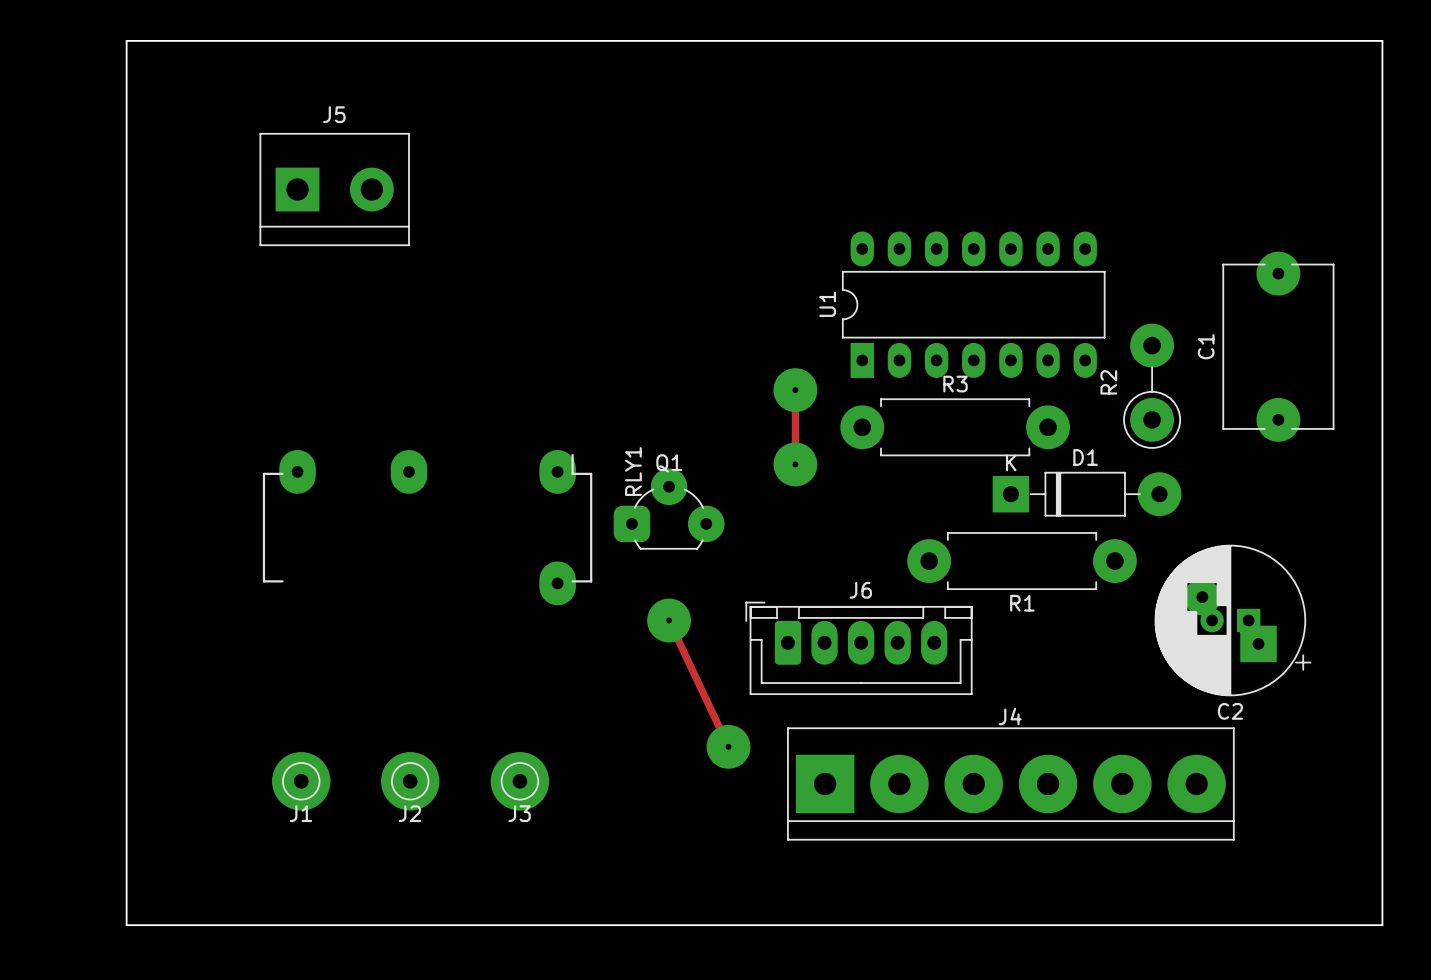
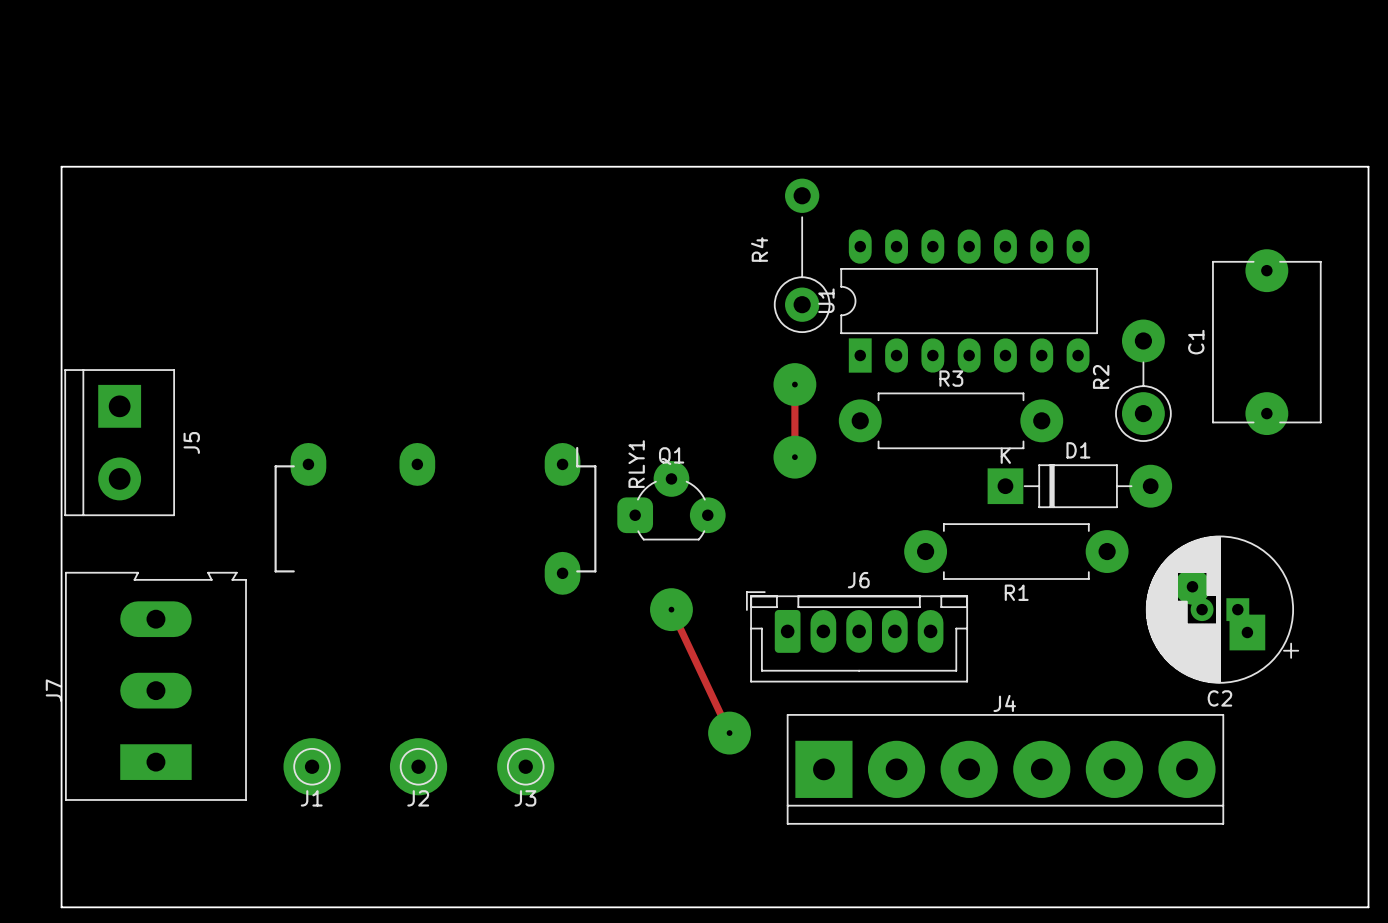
board edge: (1382, 167) (1382, 40) (126, 40) (126, 925) -> (1368, 166) (61, 166) (61, 907) (141, 907)
J5 rotation: 0° (334, 189) -> 90° clockwise (119, 442)
J5 position: (334, 189) -> (119, 442)
R4: none -> (802, 255)
J7: none -> (155, 686)

